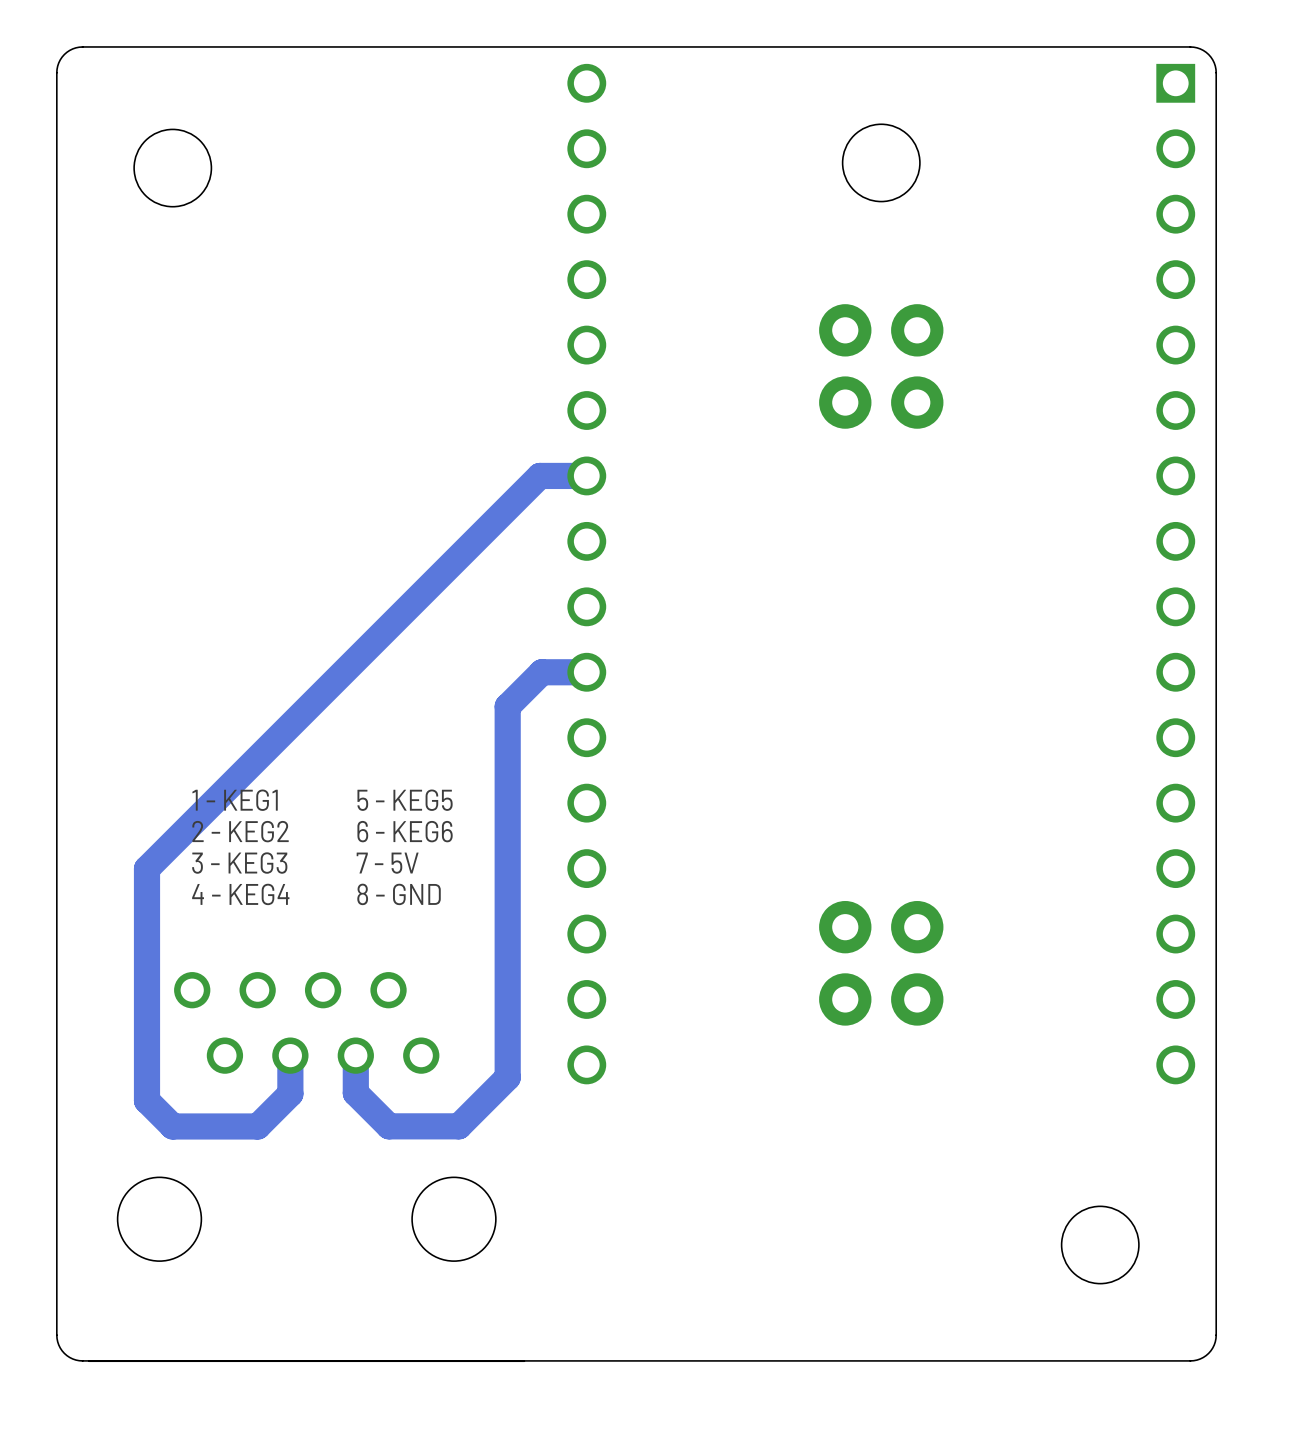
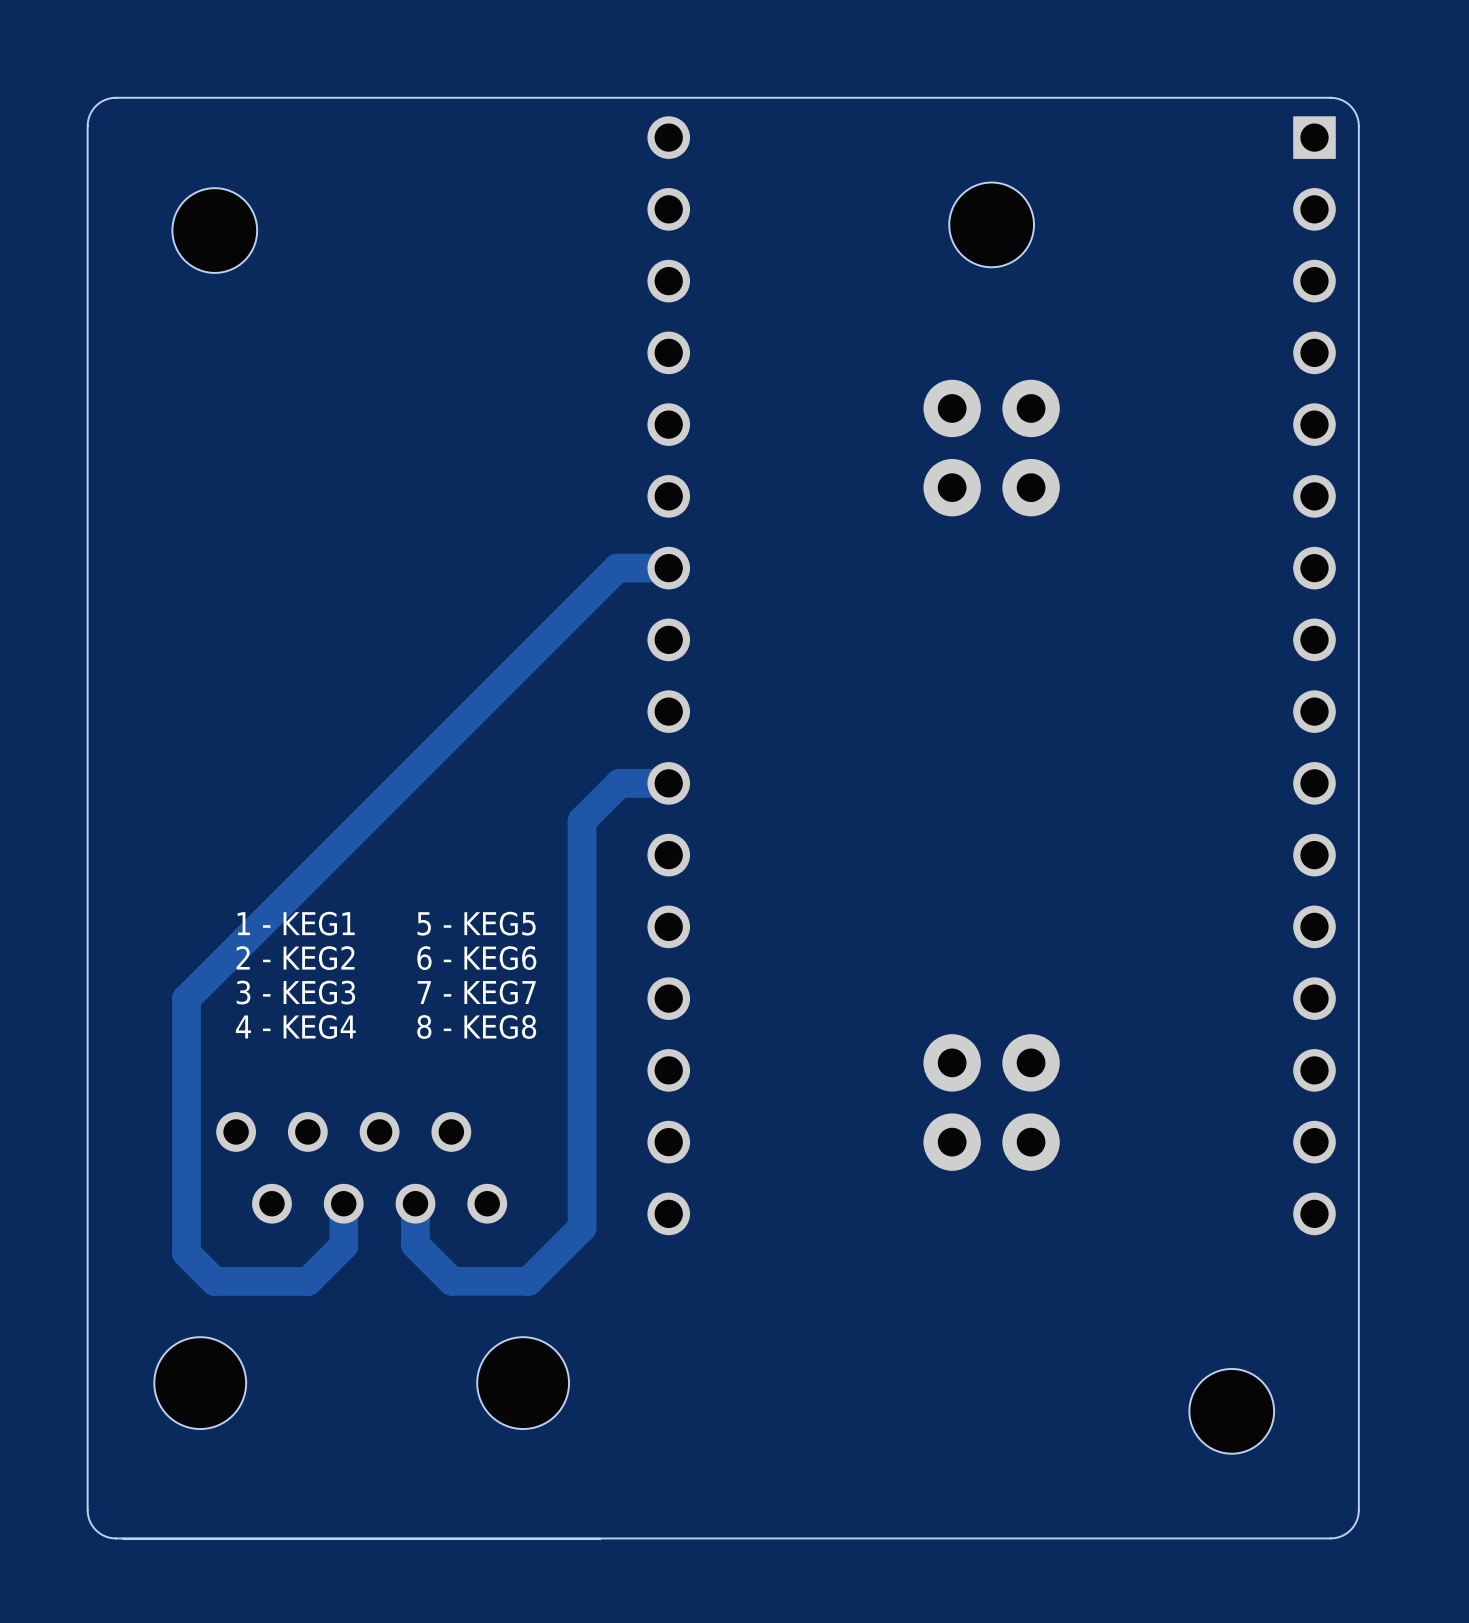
text: 7 - 5V (387, 863) -> 7 - KEG7 (476, 992)
text: 8 - GND (399, 894) -> 8 - KEG8 (476, 1026)

